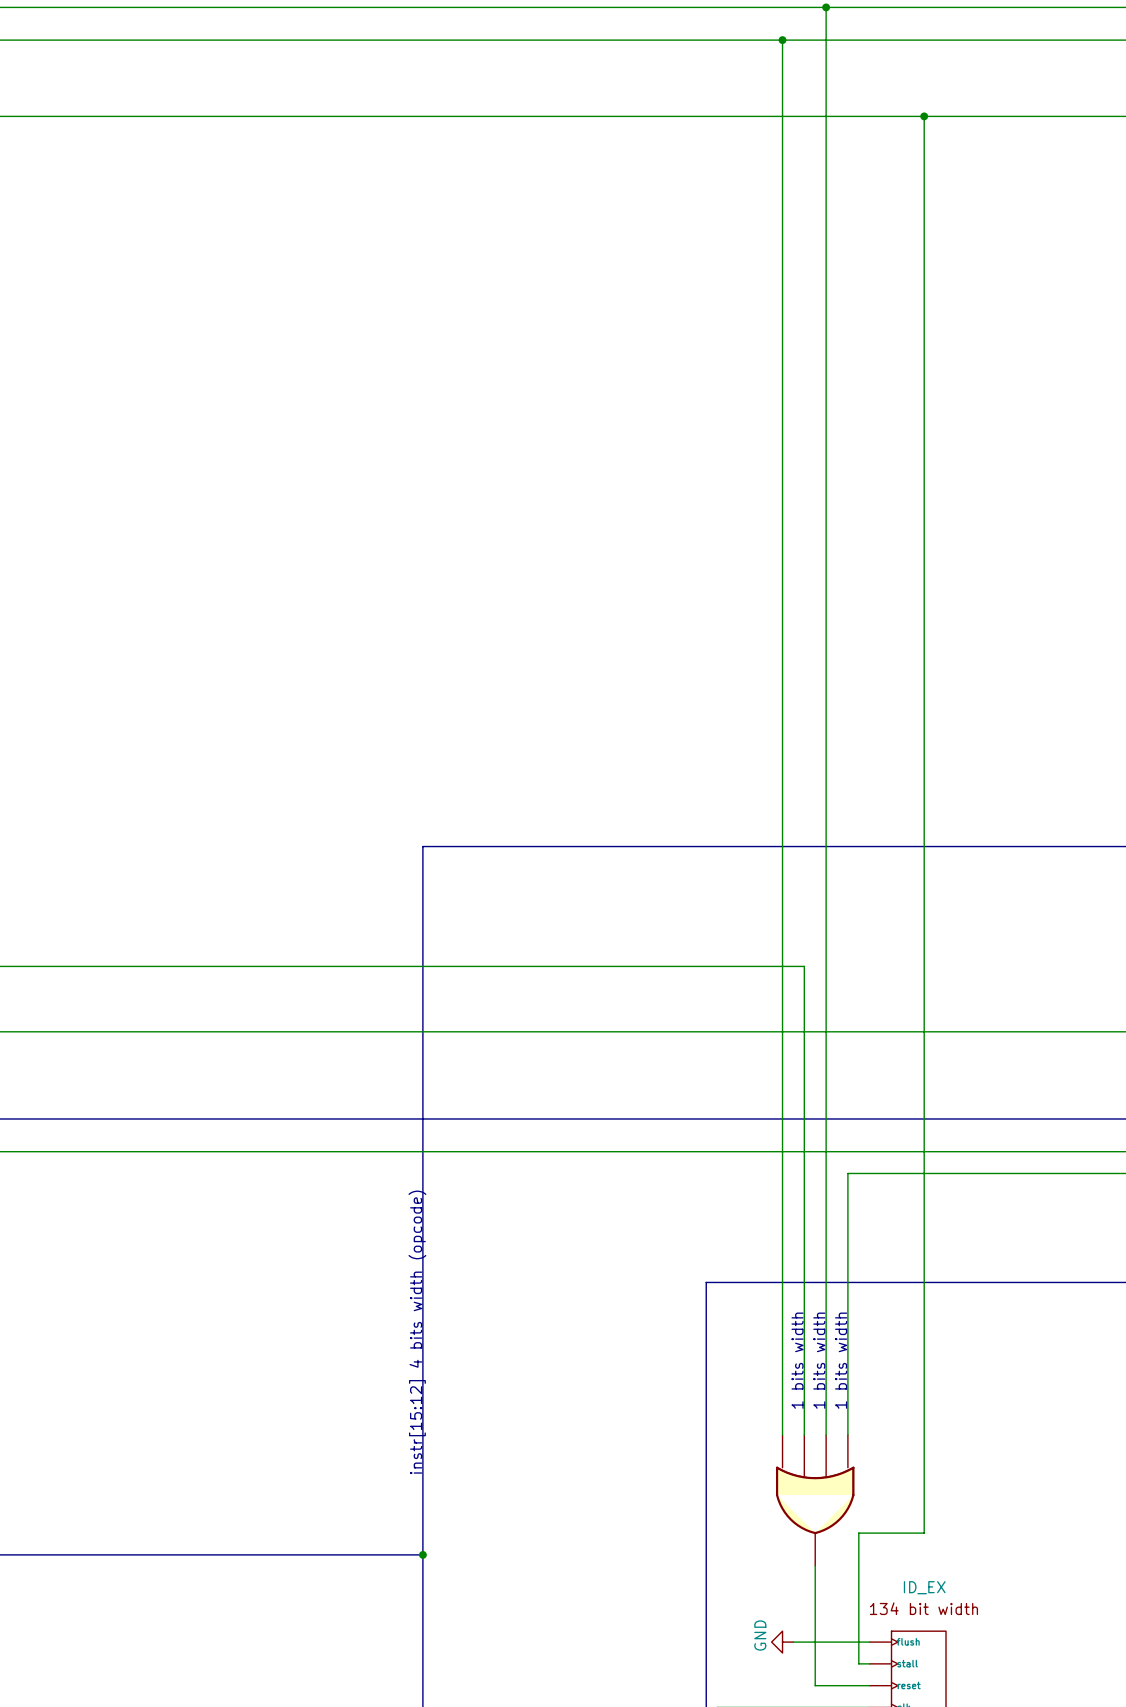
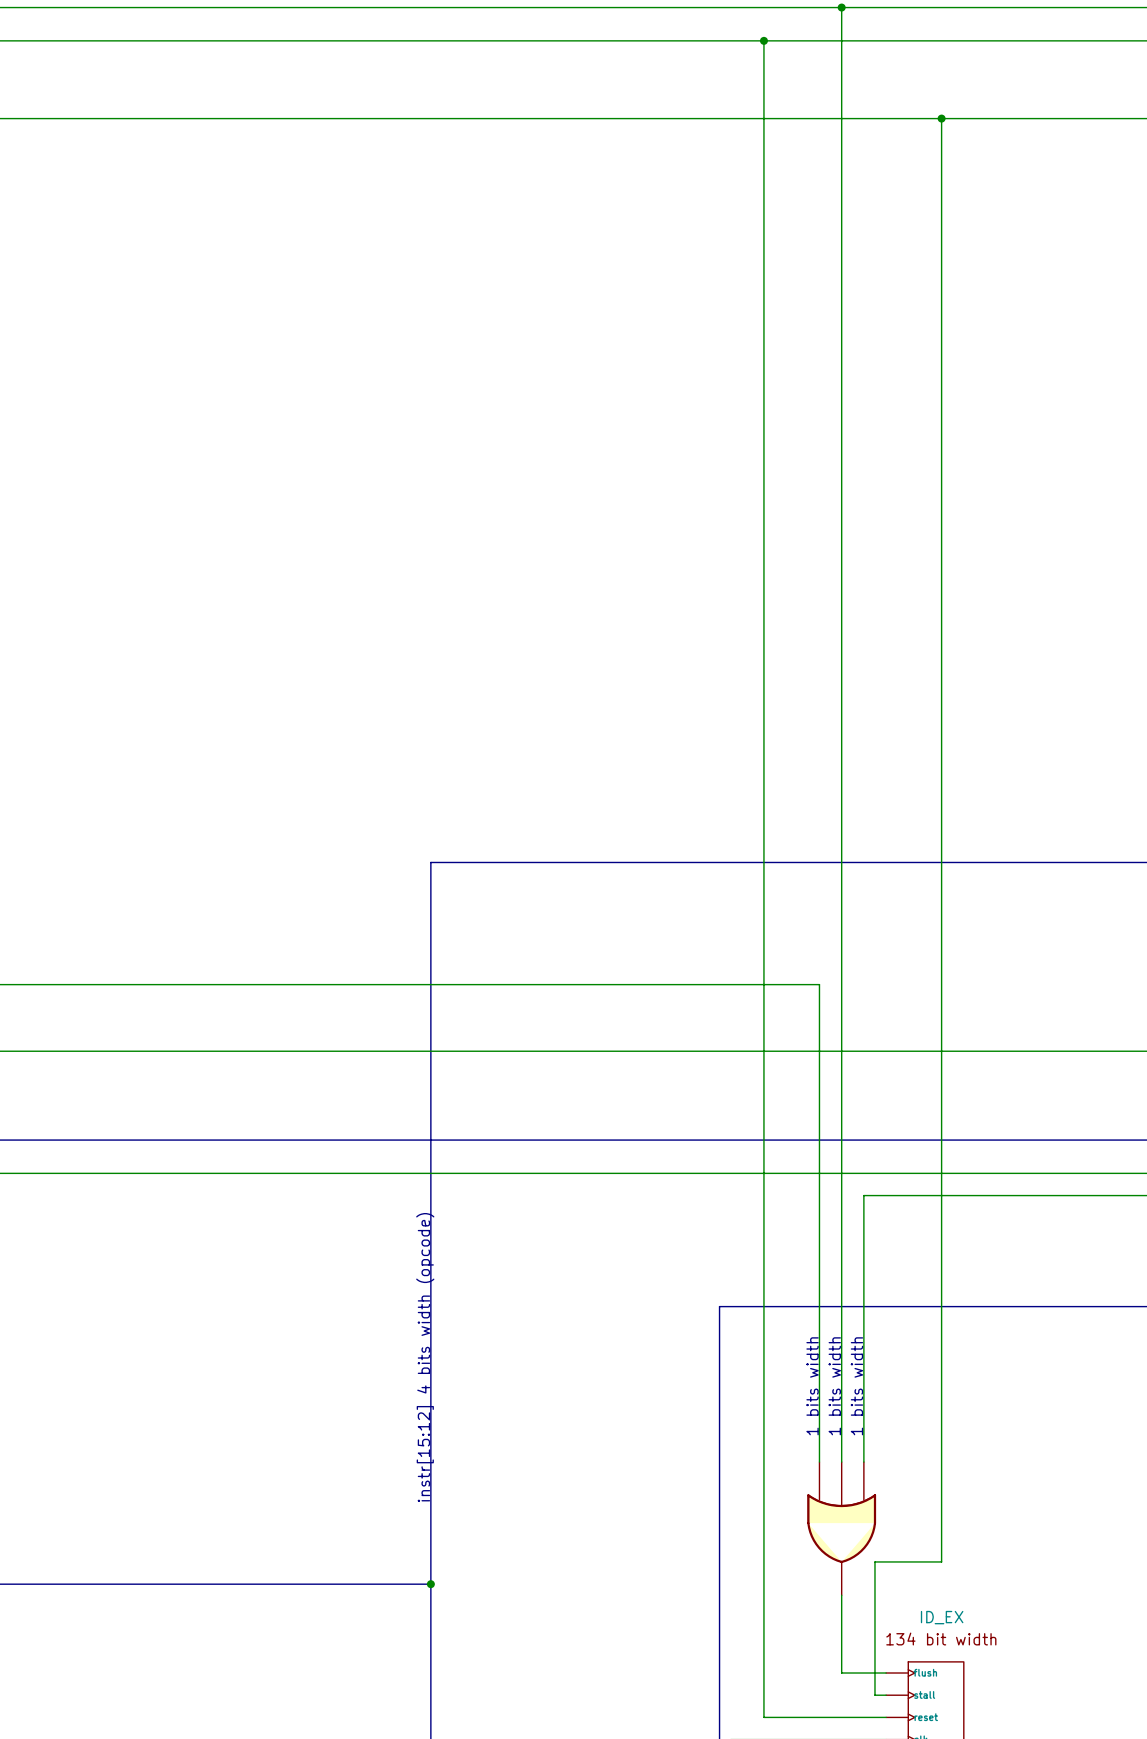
wire: (782, 40) (782, 1435) -> none
junction position: (782, 40) -> (763, 40)
part: (815, 1500) -> none
part: none -> (841, 1528)
wire: (815, 1565) (815, 1685) -> (763, 40) (763, 1717) (830, 1717)
power symbol: GND (782, 1642) -> none
wire: (793, 1642) (826, 1642) -> (841, 1595) (841, 1673)

